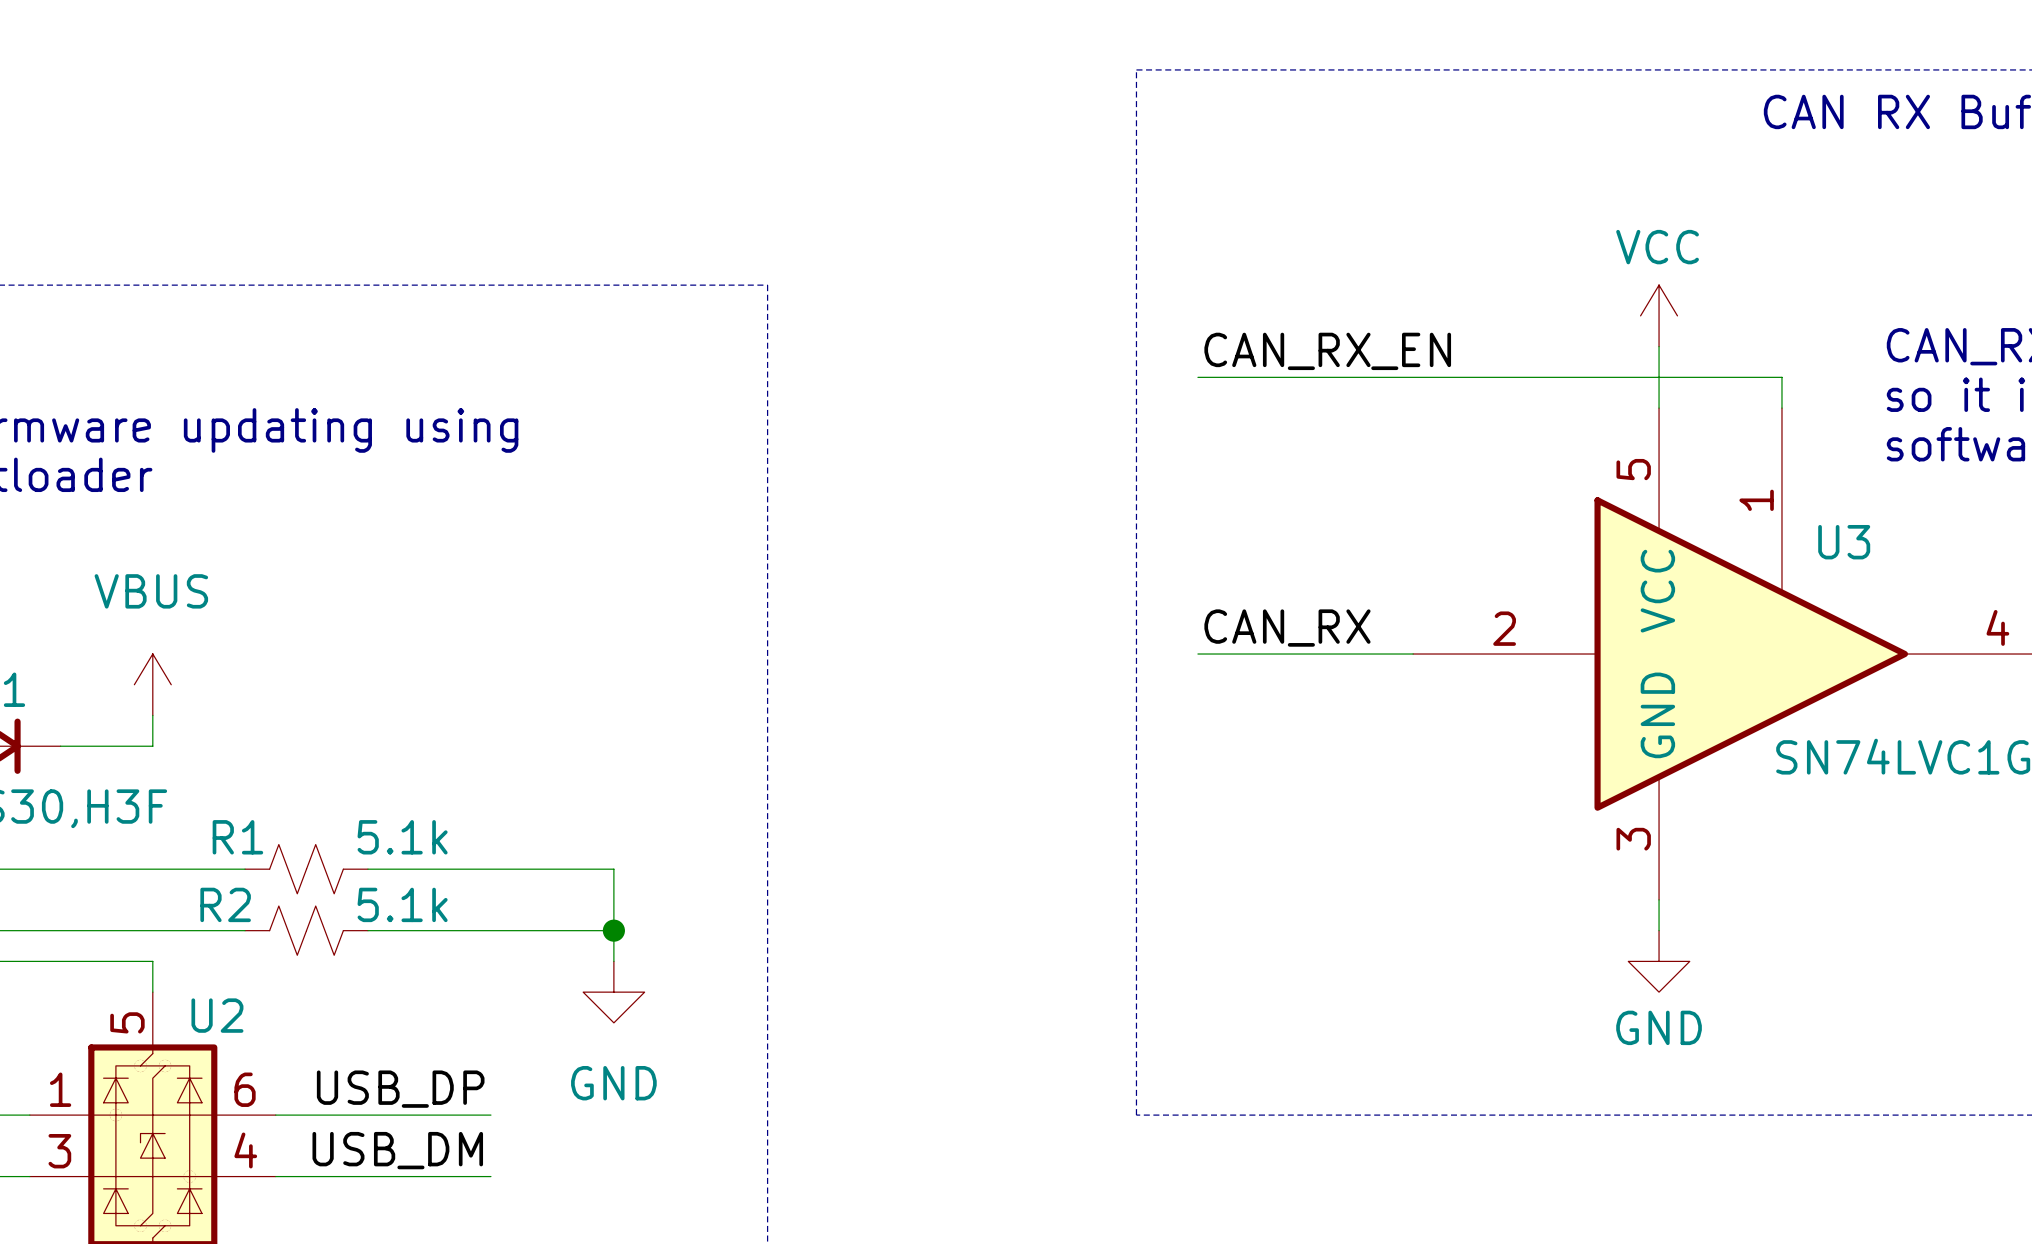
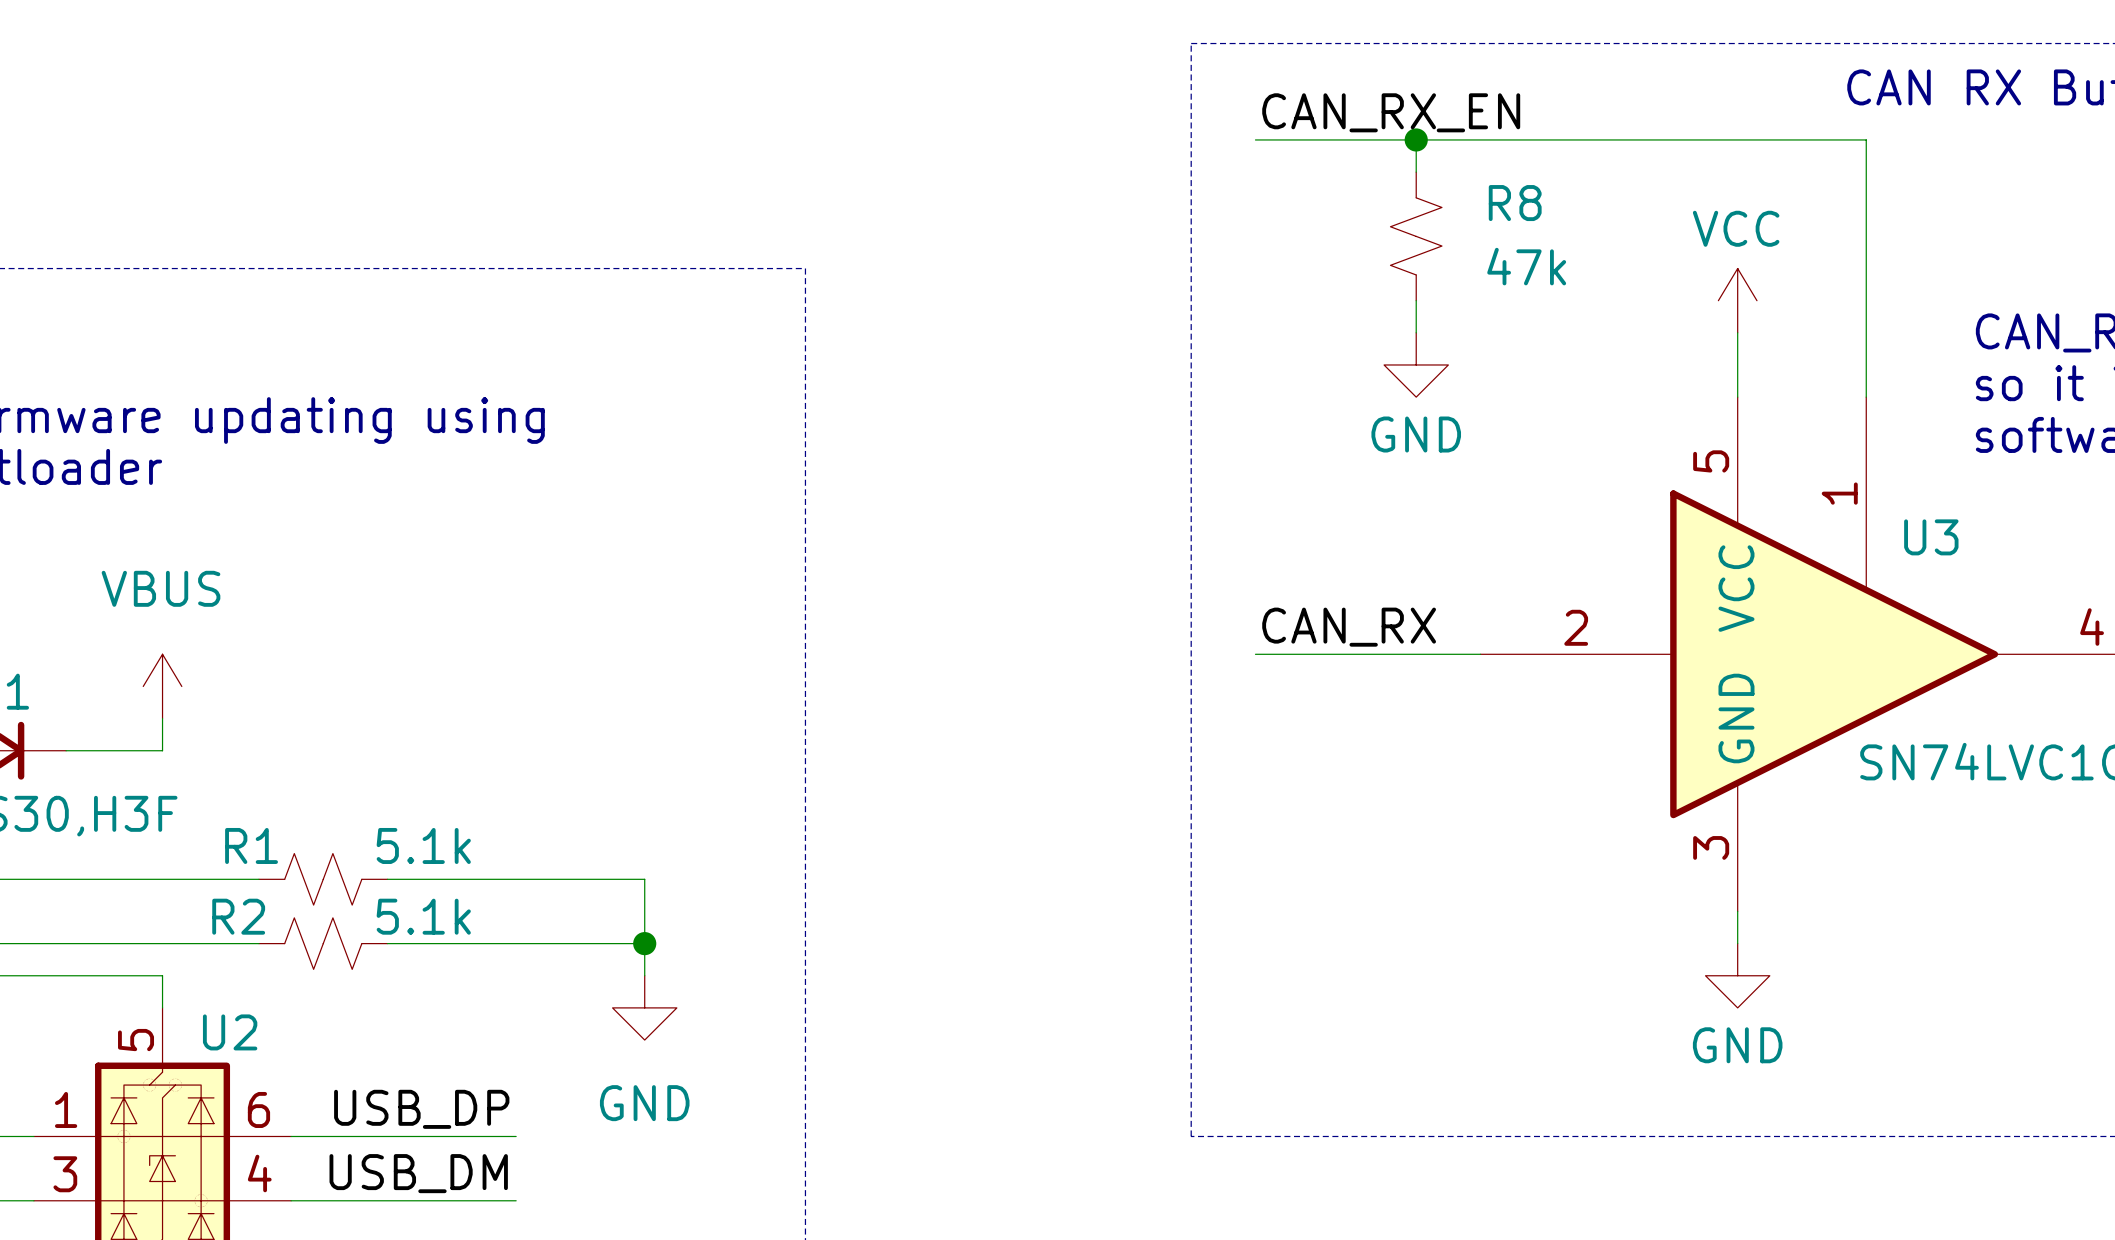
wire: none -> (1416, 139) (1416, 172)
junction: none -> (1416, 139)
R8: none -> 47k (1416, 236)
wire: none -> (1416, 300) (1416, 332)
label position: CAN_RX_EN (1327, 351) -> CAN_RX_EN (1391, 112)
wire: (1197, 377) (1781, 377) -> (1255, 139) (1866, 139) (1866, 364)
power symbol: none -> GND (1416, 364)

